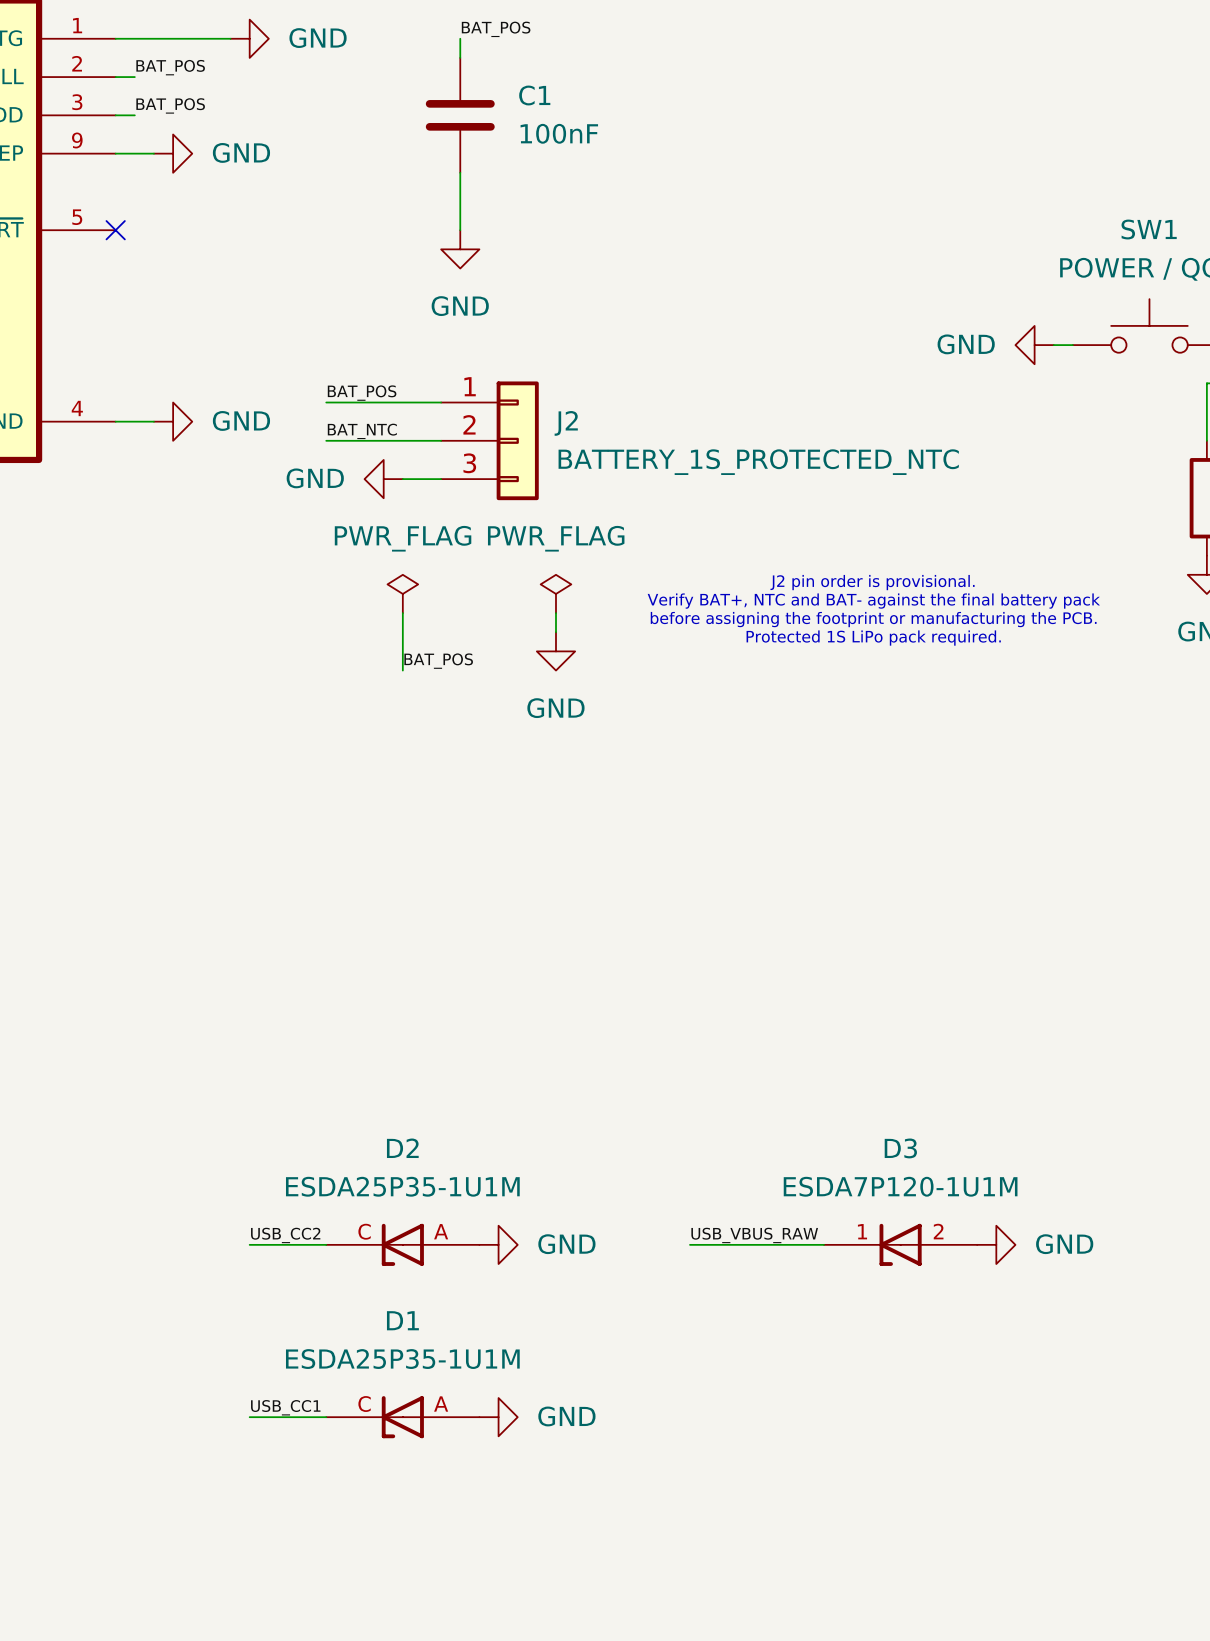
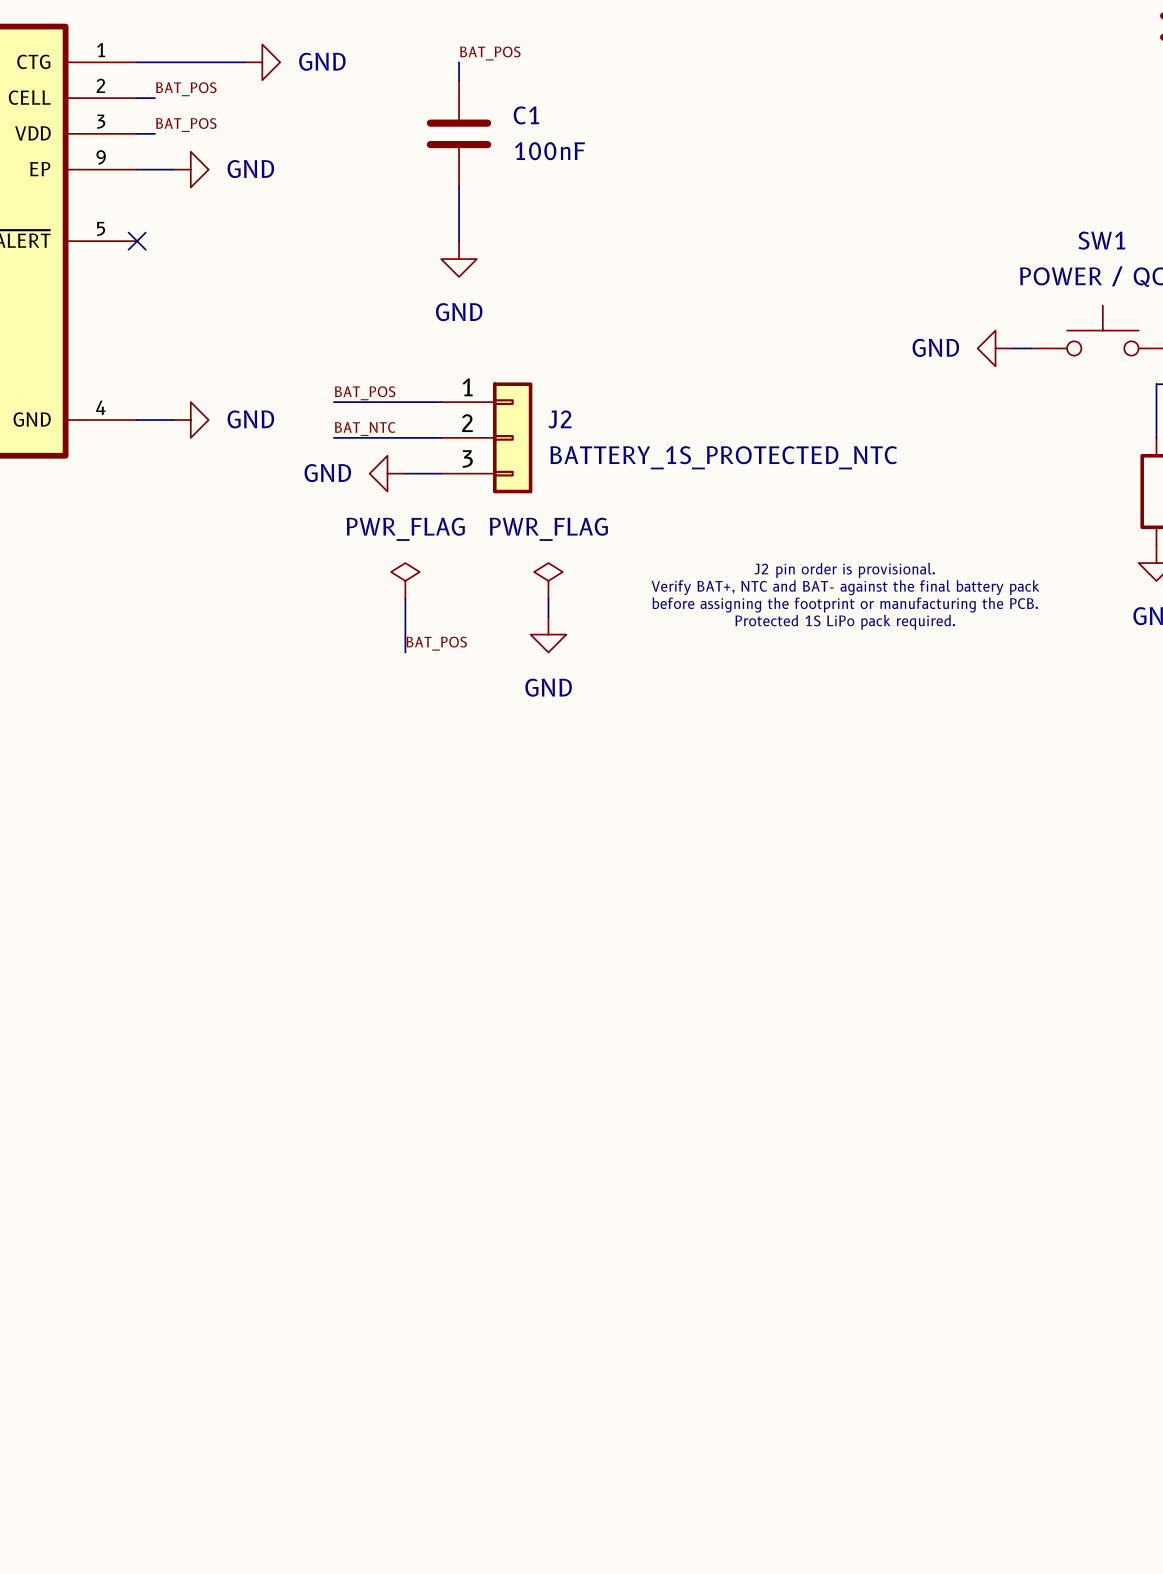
label: USB_CC2 (285, 1235) -> none
label: USB_VBUS_RAW (754, 1235) -> none
wire: (249, 1244) (326, 1244) -> none
D2: ESDA25P35-1U1M (402, 1244) -> none
power symbol: GND (498, 1244) -> none
wire: (690, 1244) (824, 1244) -> none
D3: ESDA7P120-1U1M (900, 1244) -> none
power symbol: GND (996, 1244) -> none
label: USB_CC1 (285, 1407) -> none
wire: (249, 1417) (326, 1417) -> none
D1: ESDA25P35-1U1M (402, 1417) -> none
power symbol: GND (498, 1417) -> none

